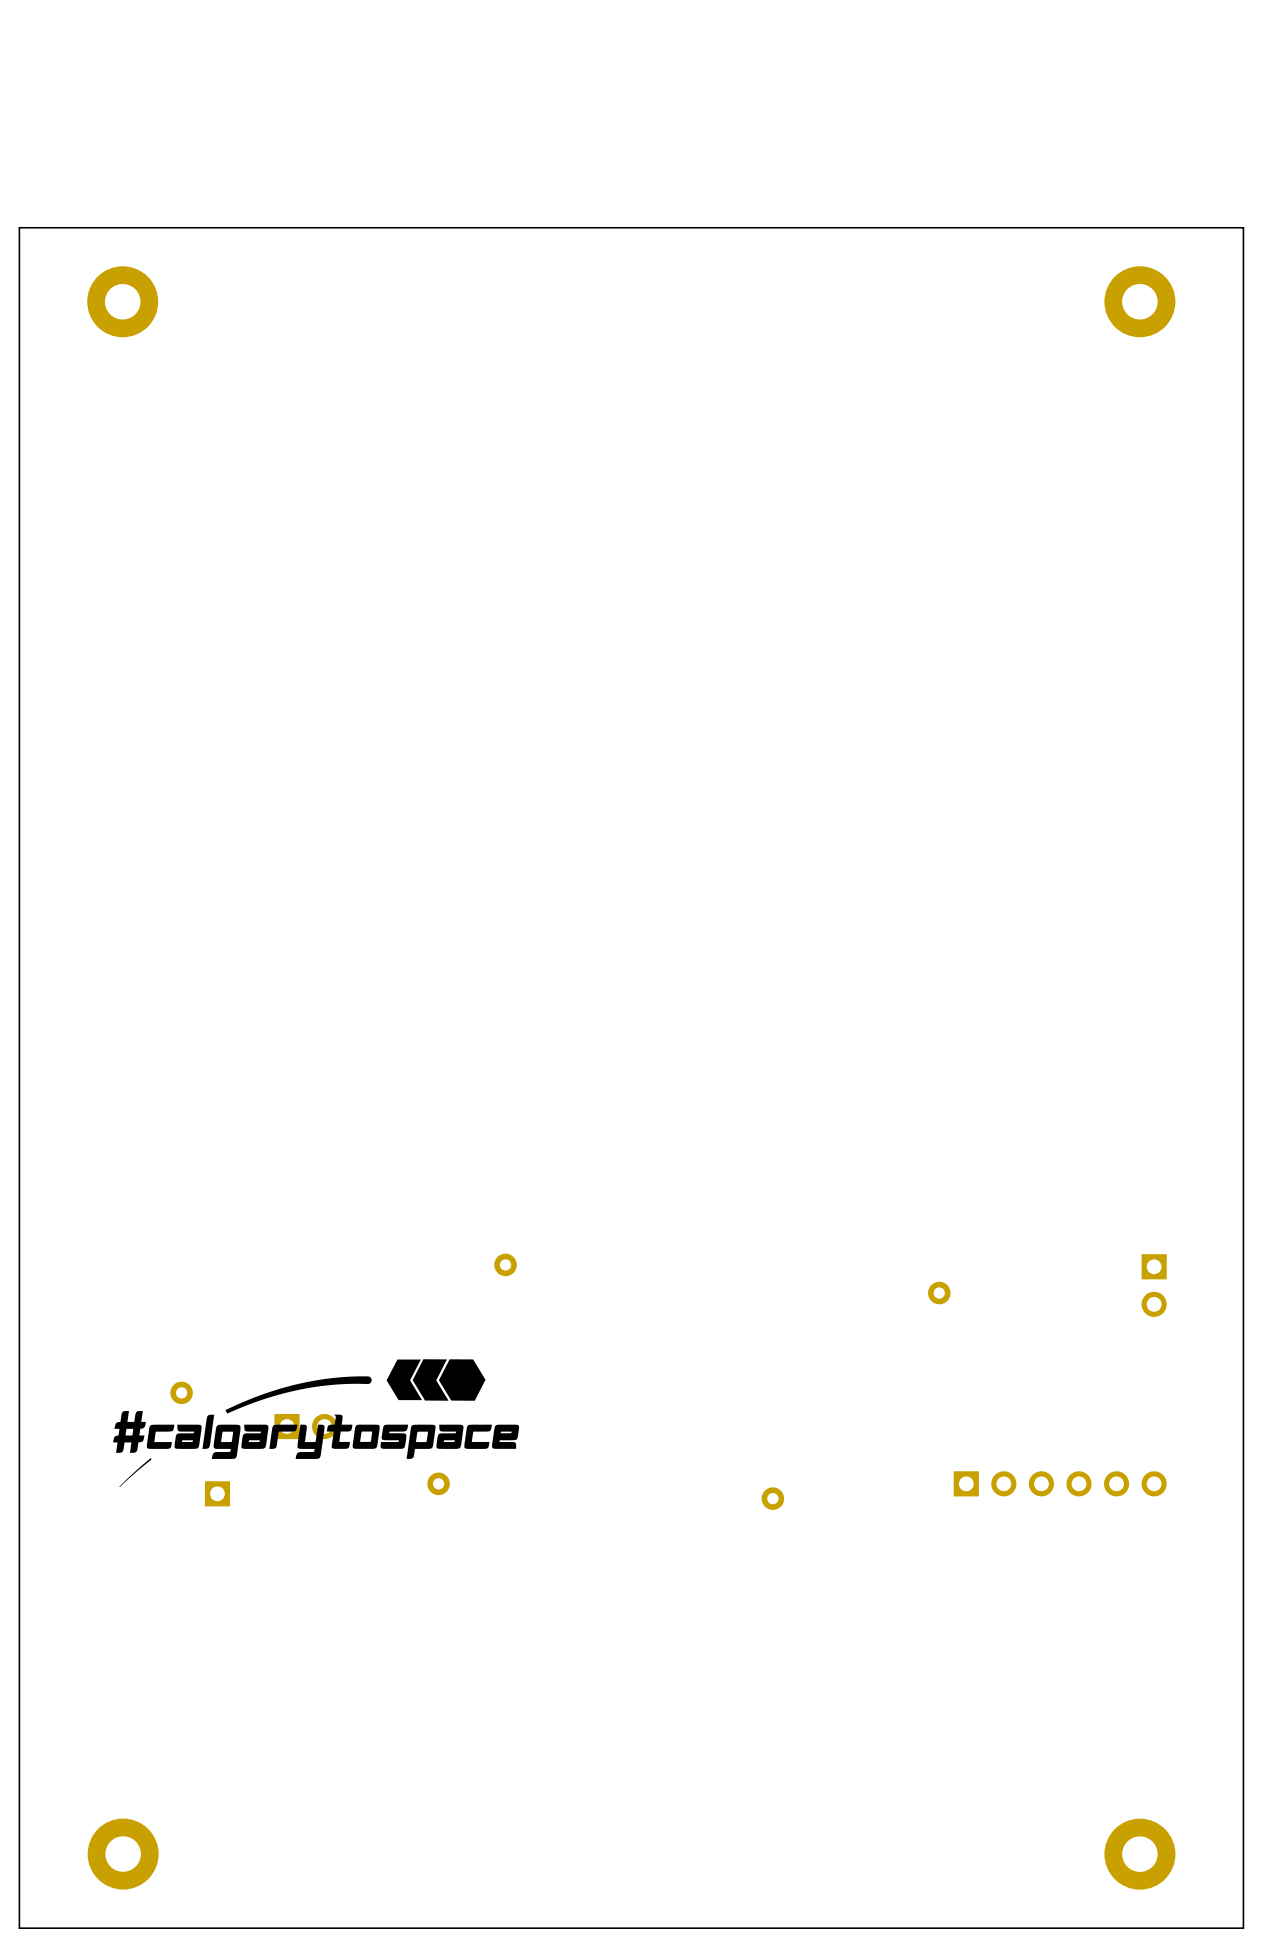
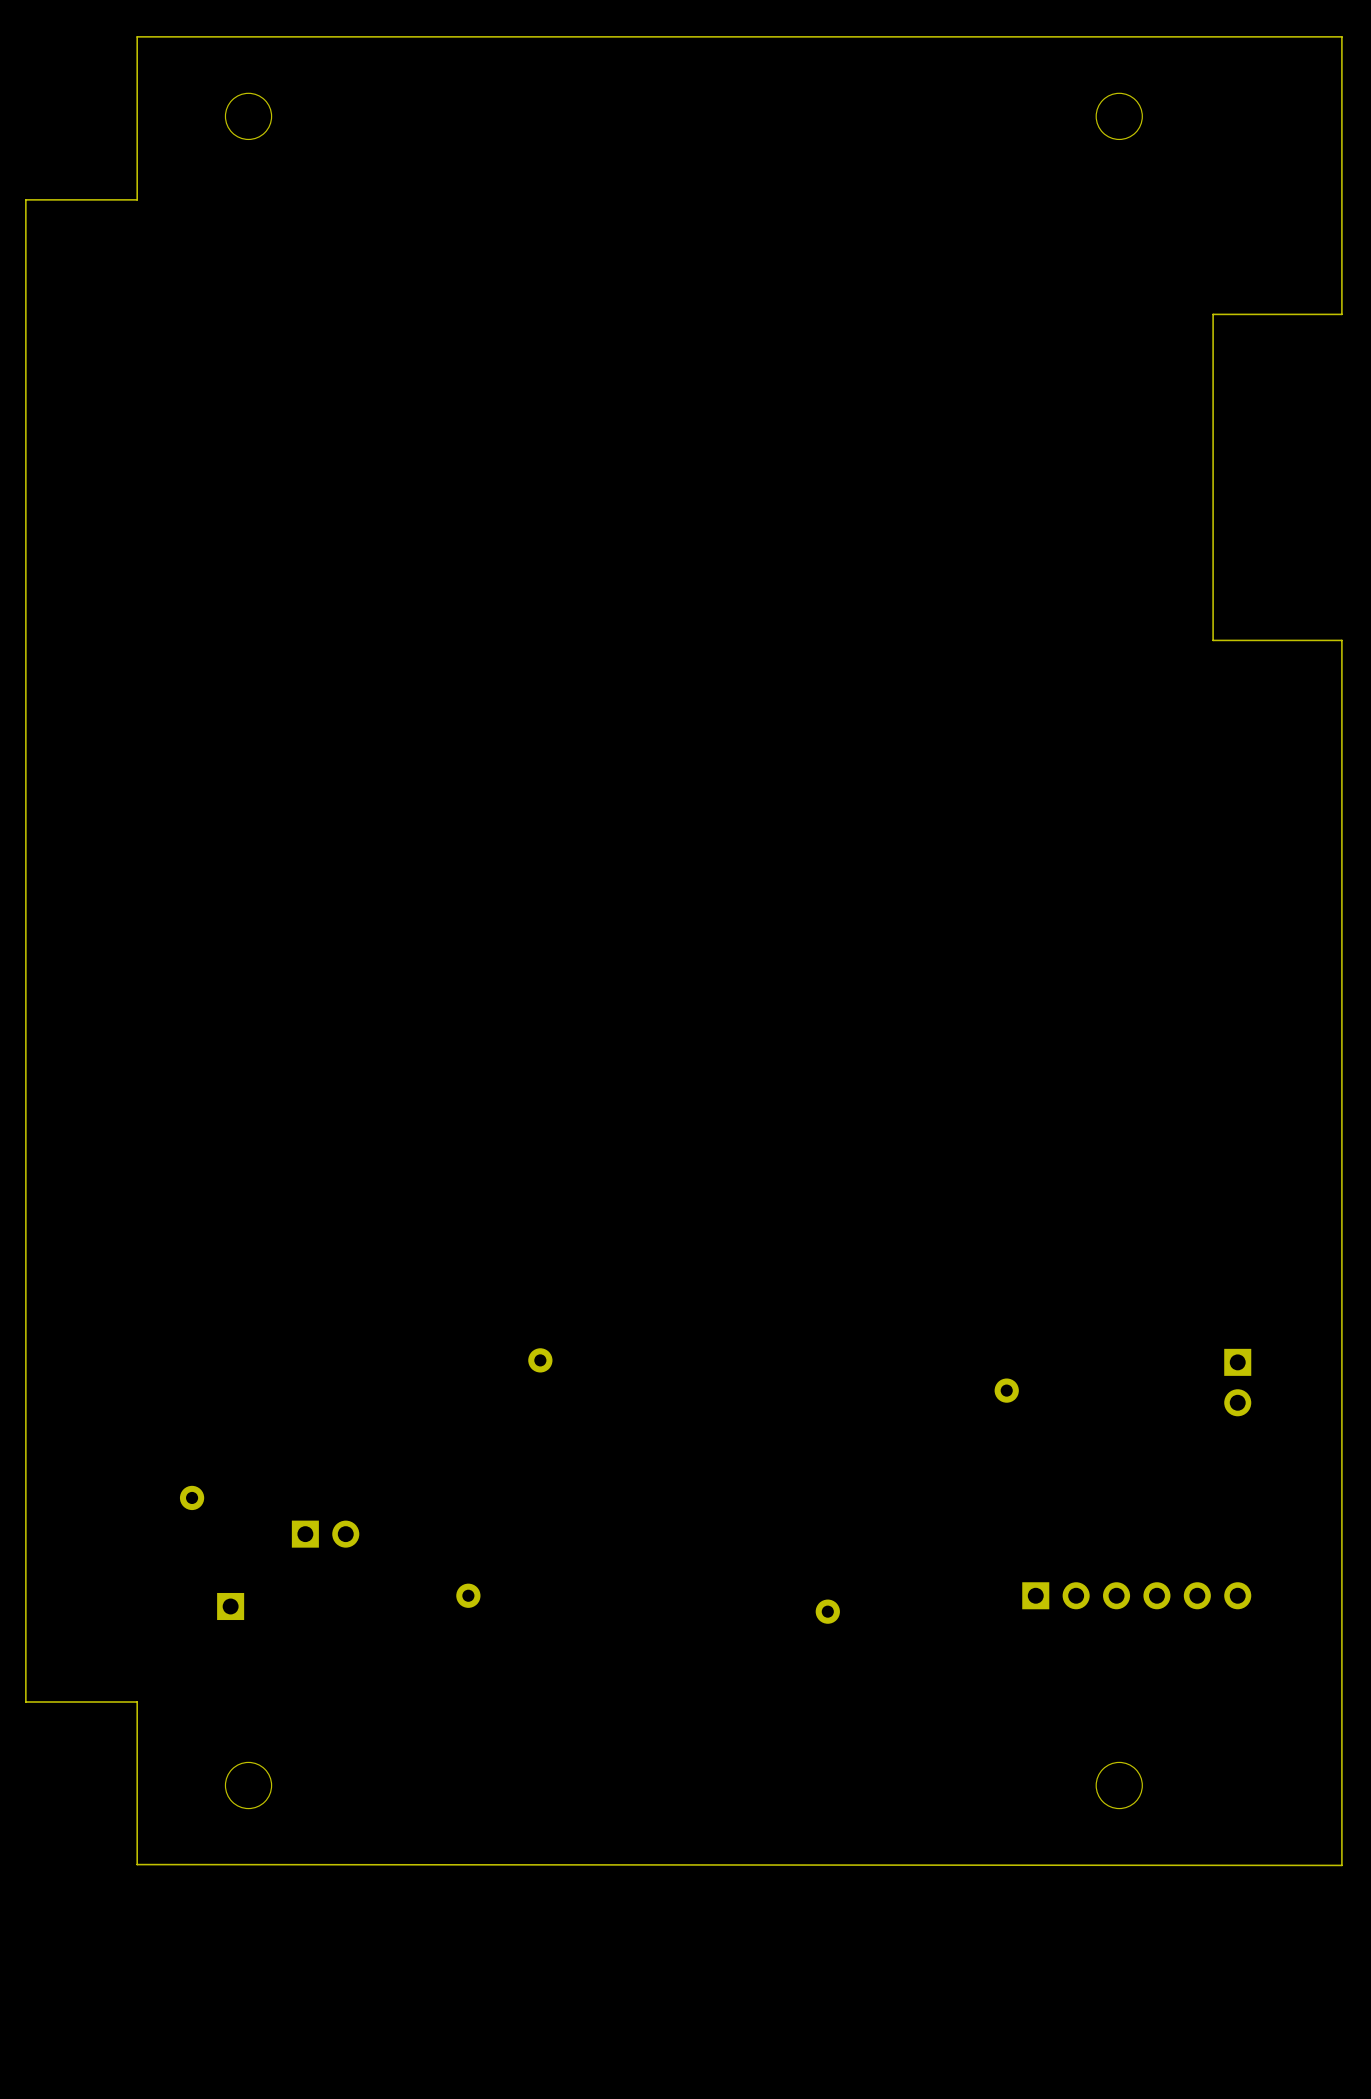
round board edge: none -> [225, 92, 272, 140]
round board edge: none -> [1095, 92, 1143, 140]
board edge: (1243, 227) (19, 227) (19, 1928) (1243, 1928) (1243, 227) -> (1341, 36) (1341, 314) (1213, 314) (1213, 640) (1341, 640) (1341, 1865) (137, 1864) (137, 1702) (25, 1702) (25, 199) (137, 199) (137, 36) (1341, 36)
part: (122, 301) -> none
part: (1139, 301) -> none
drawing: [113, 1359, 520, 1488] -> none
round board edge: none -> [225, 1762, 272, 1809]
round board edge: none -> [1095, 1762, 1143, 1809]
part: (123, 1854) -> none
part: (1139, 1854) -> none

